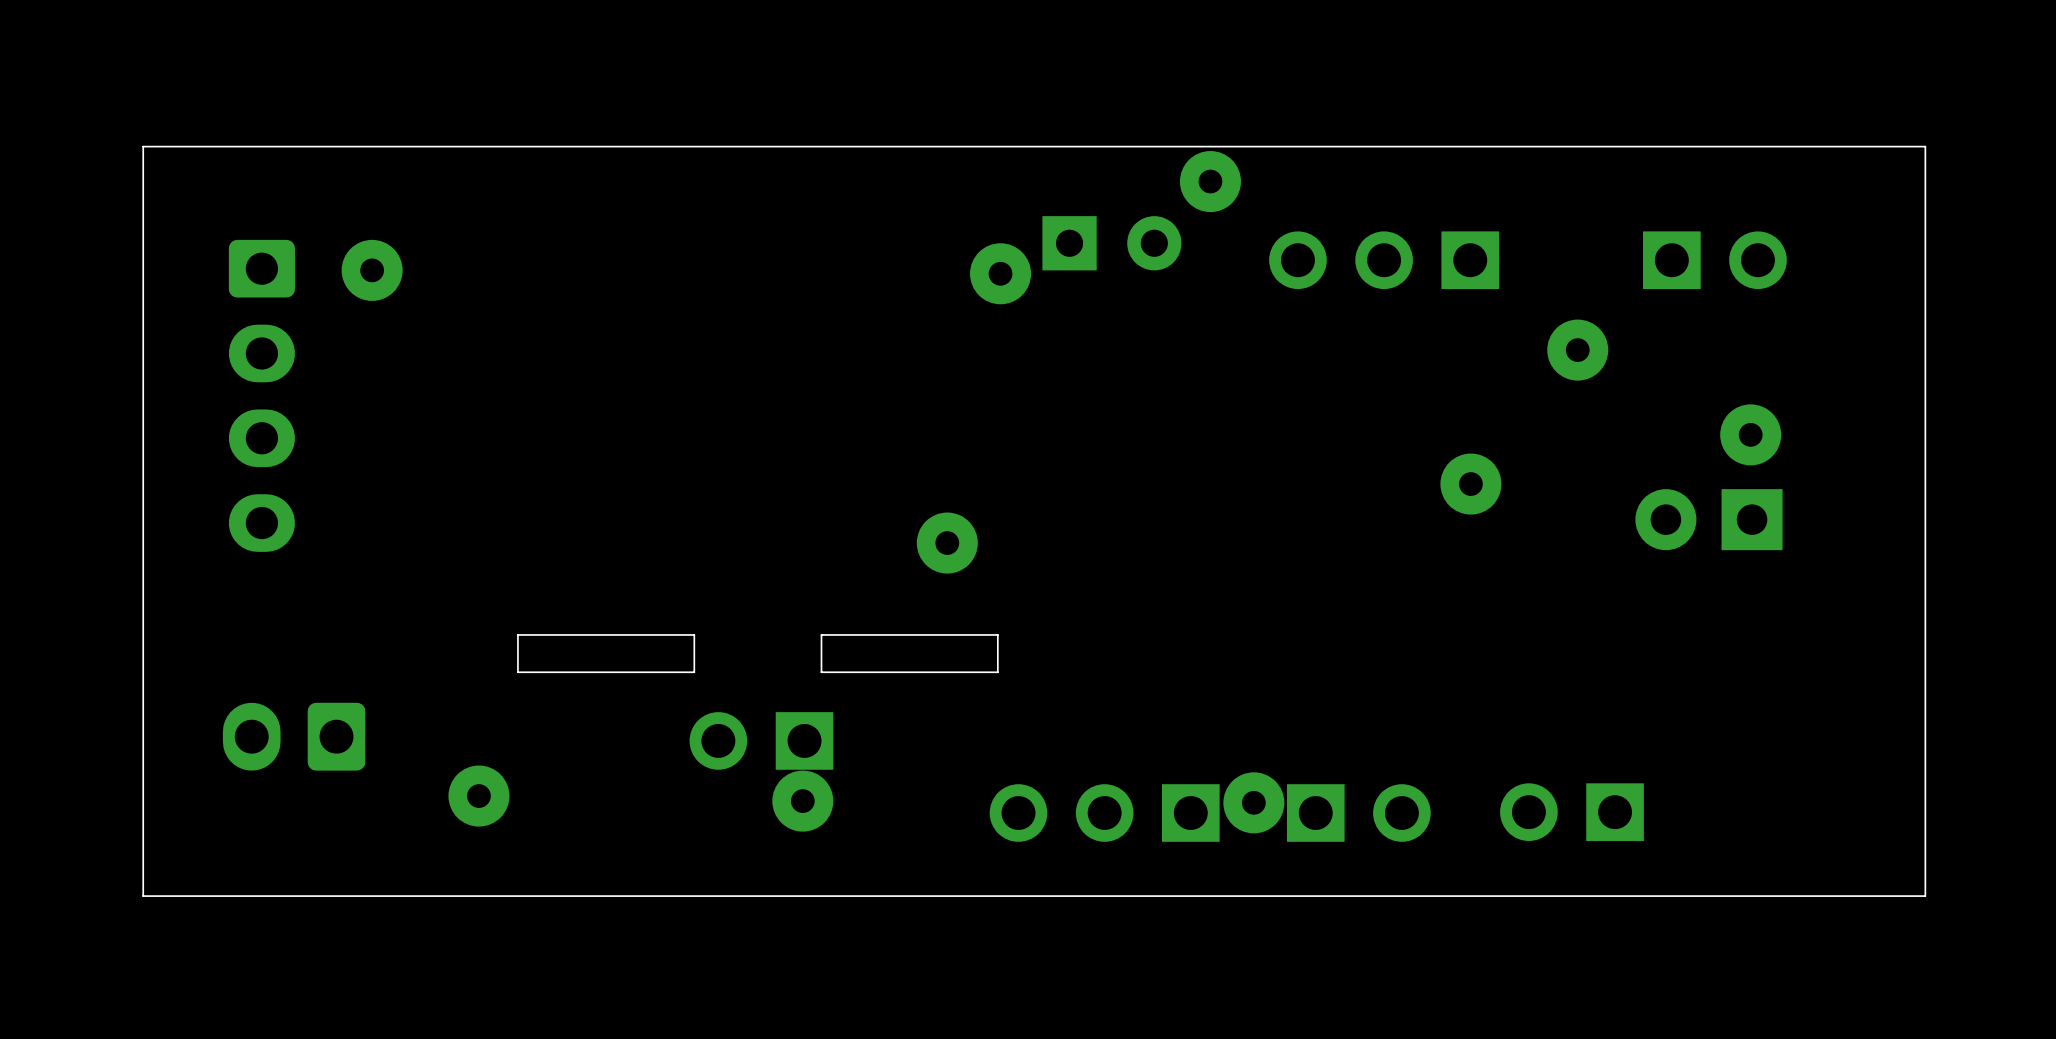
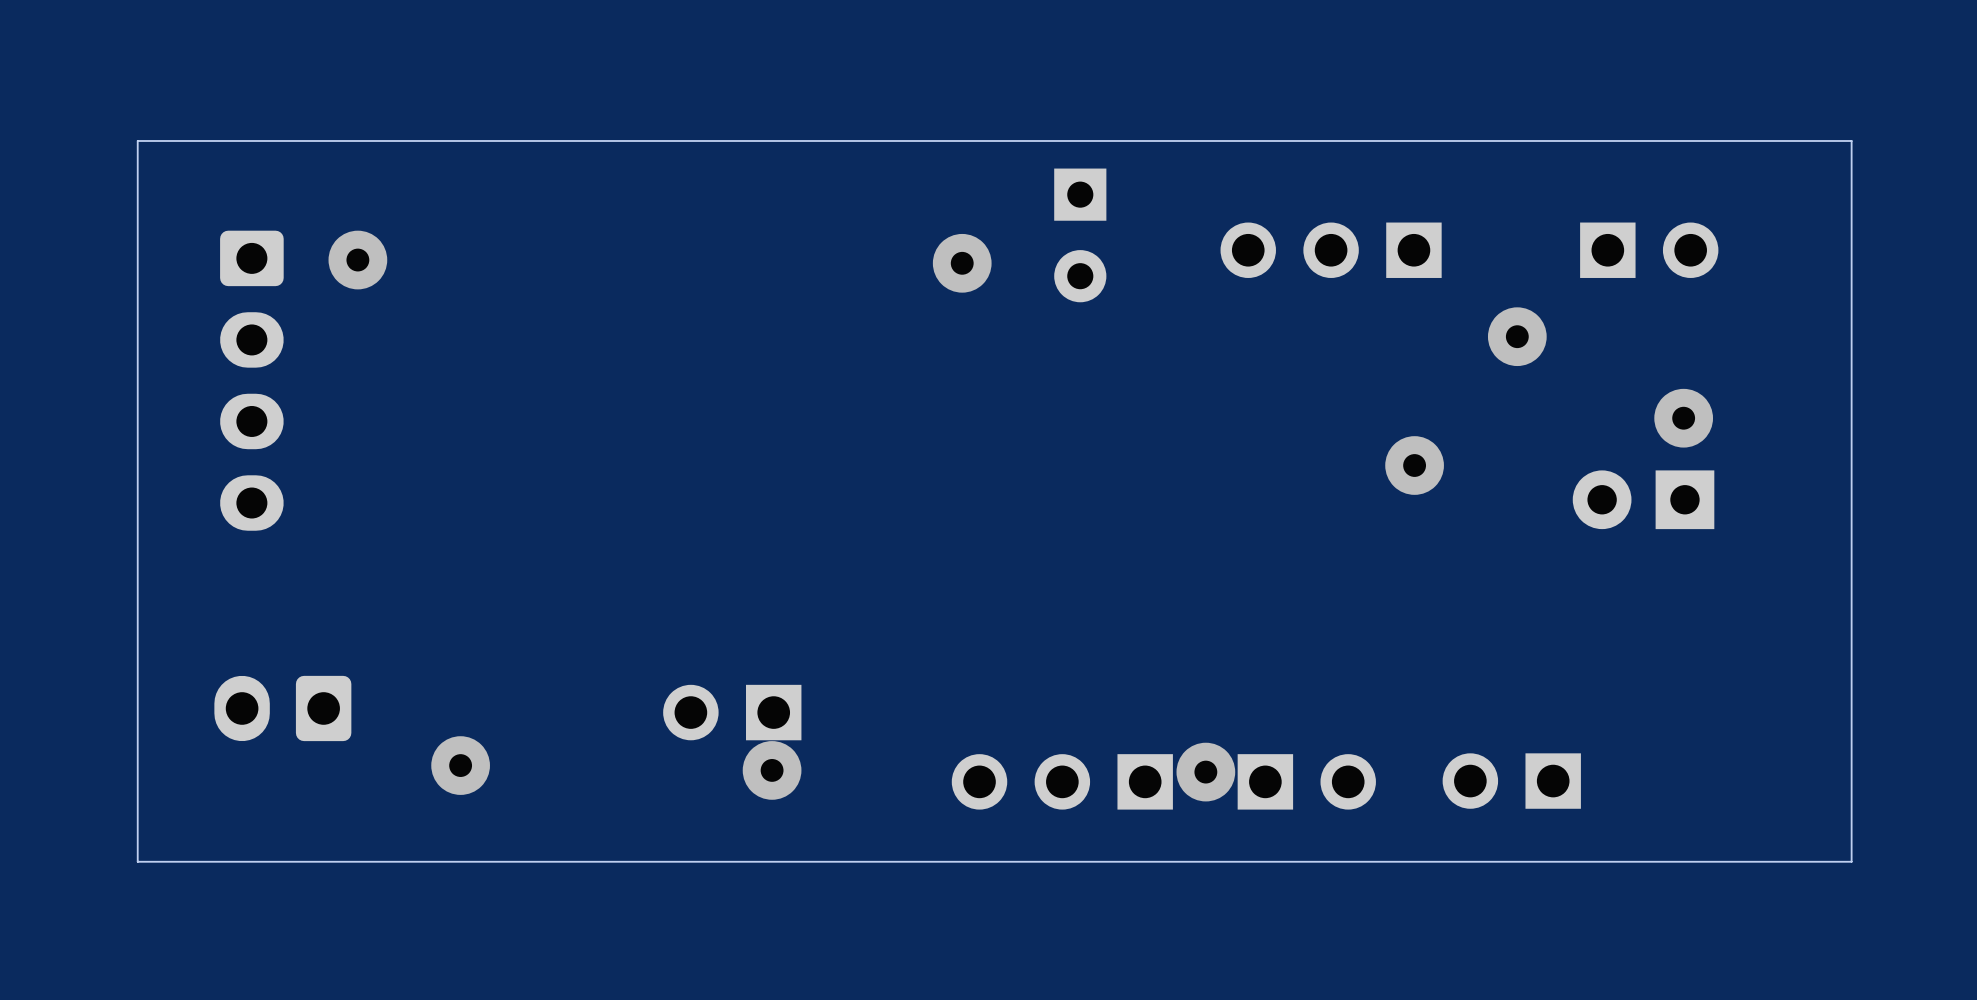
via: (1210, 181) -> none
part rotation: 0° (1111, 243) -> 90° clockwise (1080, 235)
via: (947, 543) -> none
board edge: (694, 634) (517, 634) (517, 672) (694, 672) (694, 634) -> none
board edge: (997, 634) (821, 634) (821, 672) (997, 672) (997, 634) -> none

